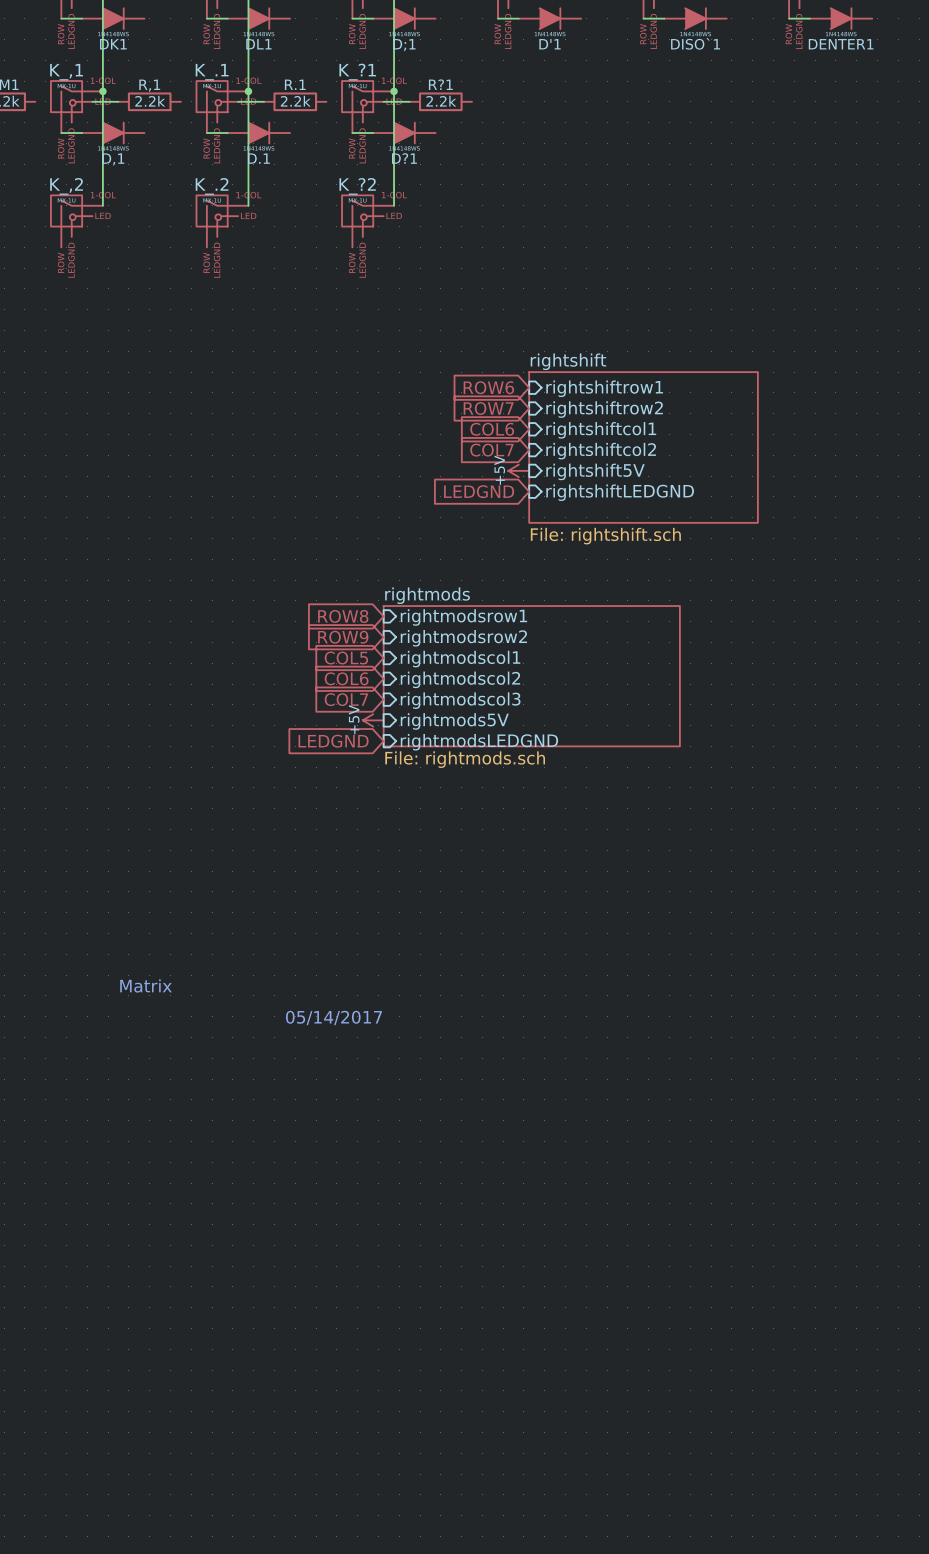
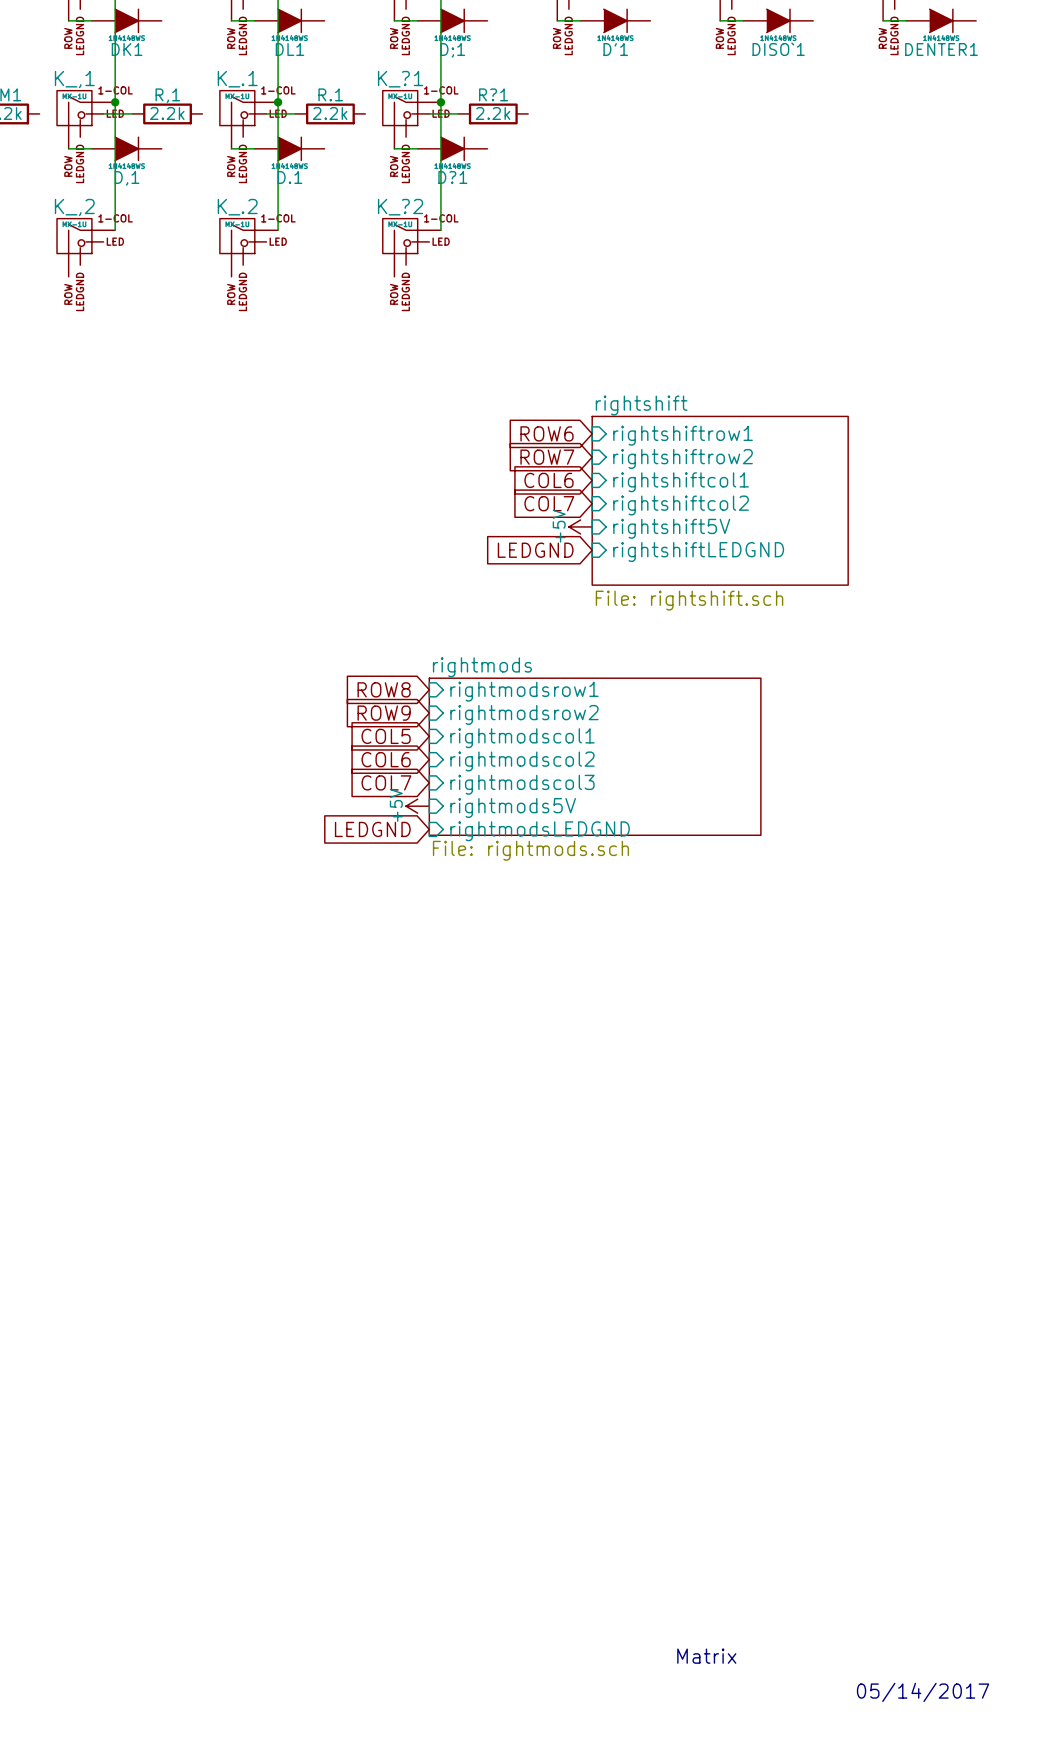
text: Matrix (146, 985) -> none
text: 05/14/2017 (334, 1017) -> none
text: none -> Matrix (706, 1656)
text: none -> 05/14/2017 (923, 1692)

